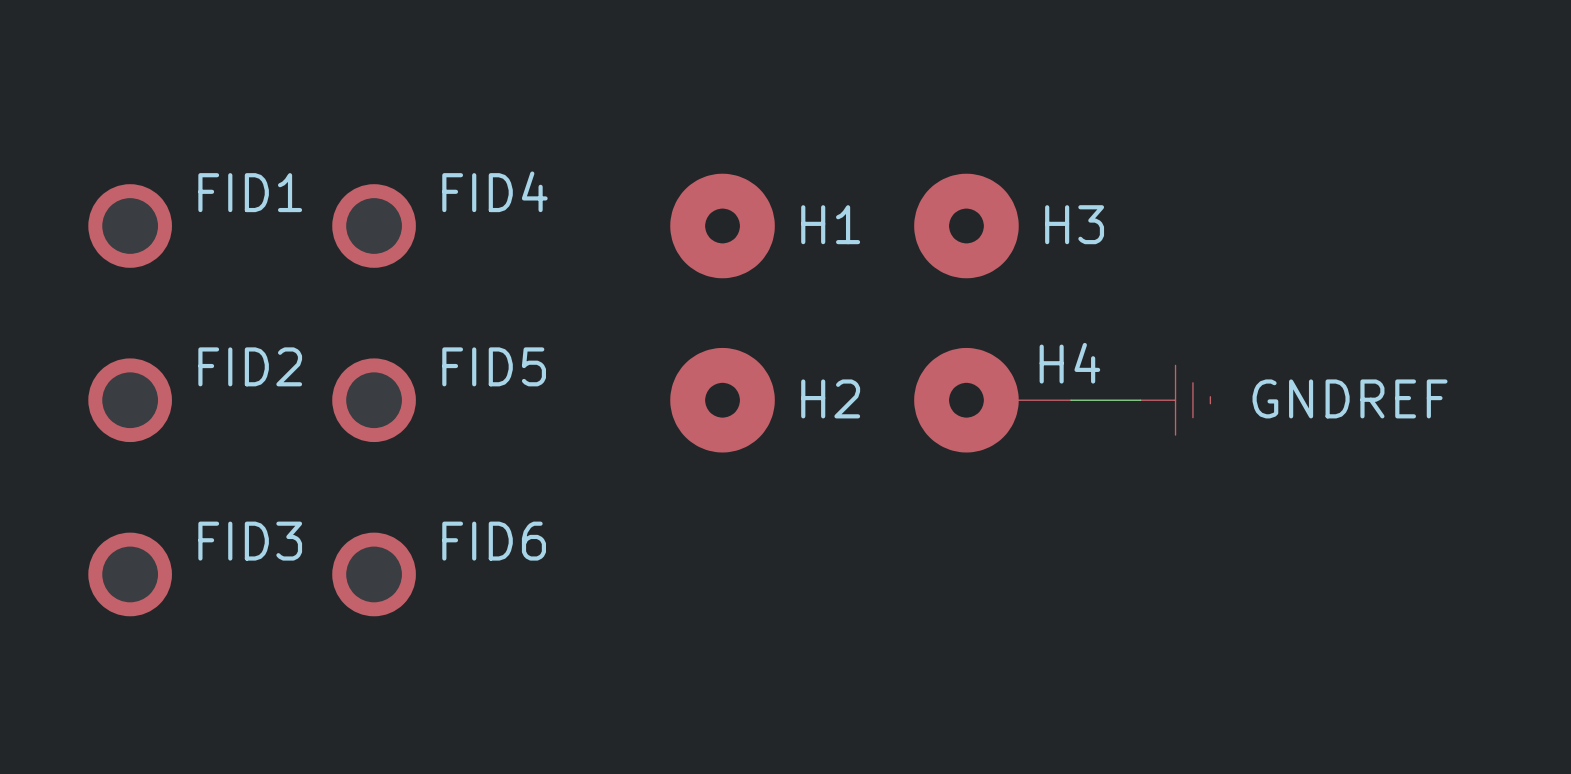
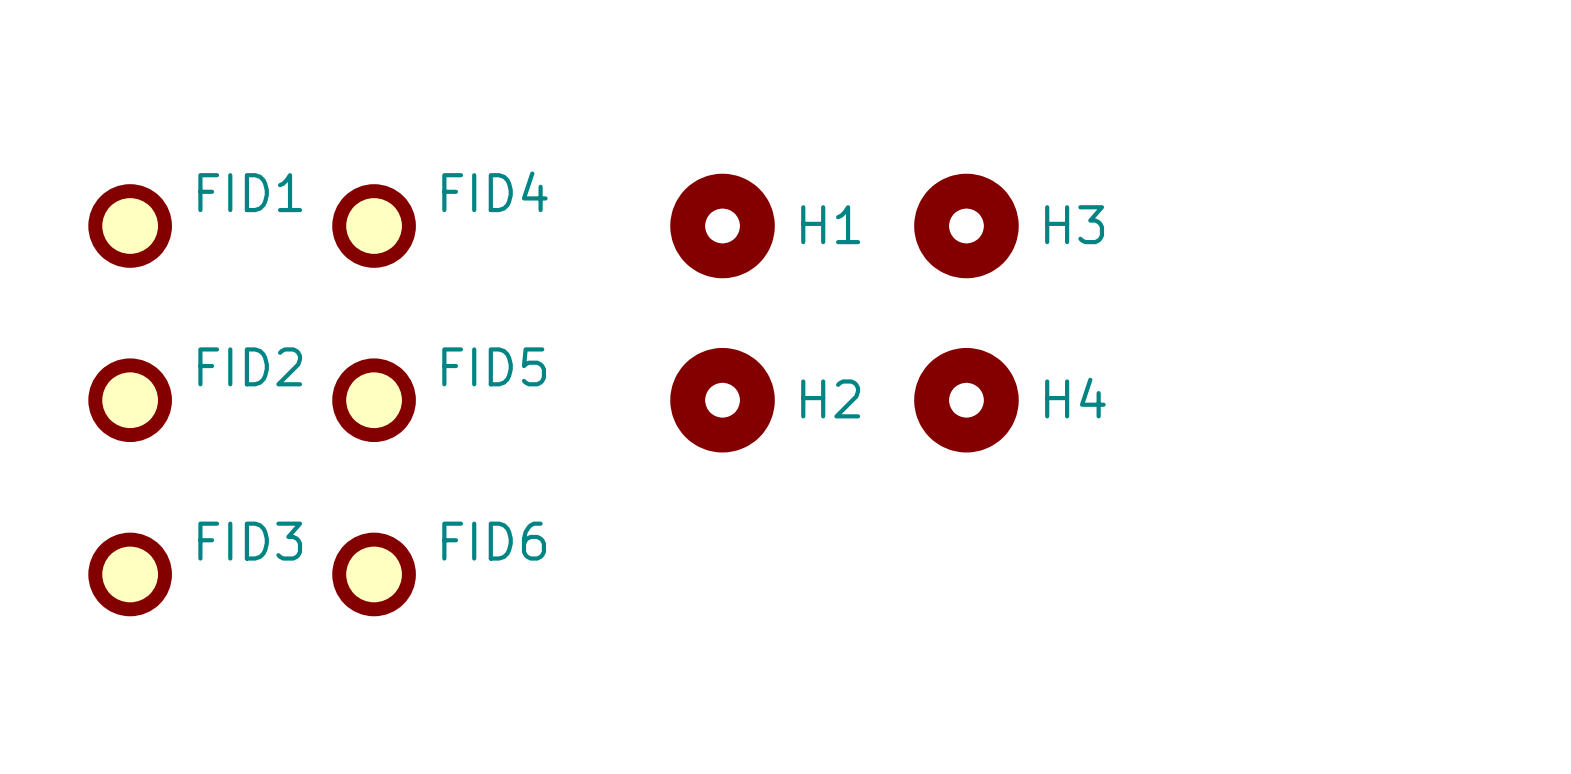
H4 symbol: [914, 347, 1071, 453] -> [914, 347, 1019, 453]
H4 name position: H4 (1069, 363) -> H4 (1075, 398)
wire: (1070, 400) (1140, 400) -> none
power symbol: GNDREF (1175, 400) -> none

